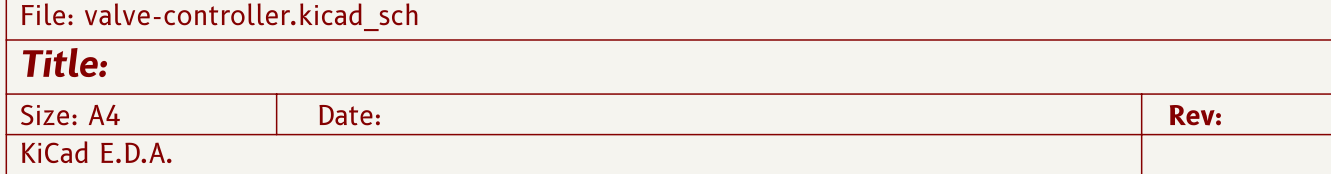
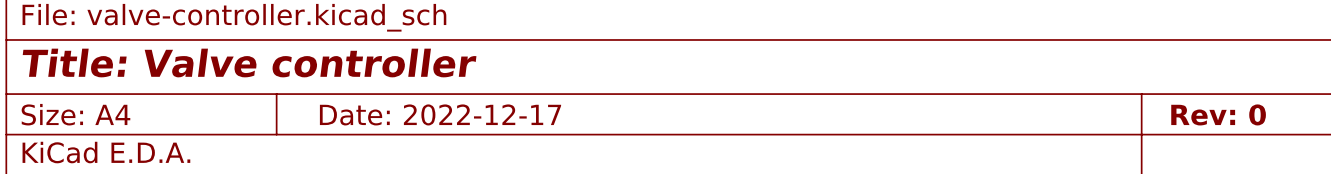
title block: Title: (64, 62) -> Title: Valve controller (249, 63)
title block: Date: (349, 115) -> Date: 2022-12-17 (440, 114)
title block: Rev: (1195, 115) -> Rev: 0 (1218, 114)

